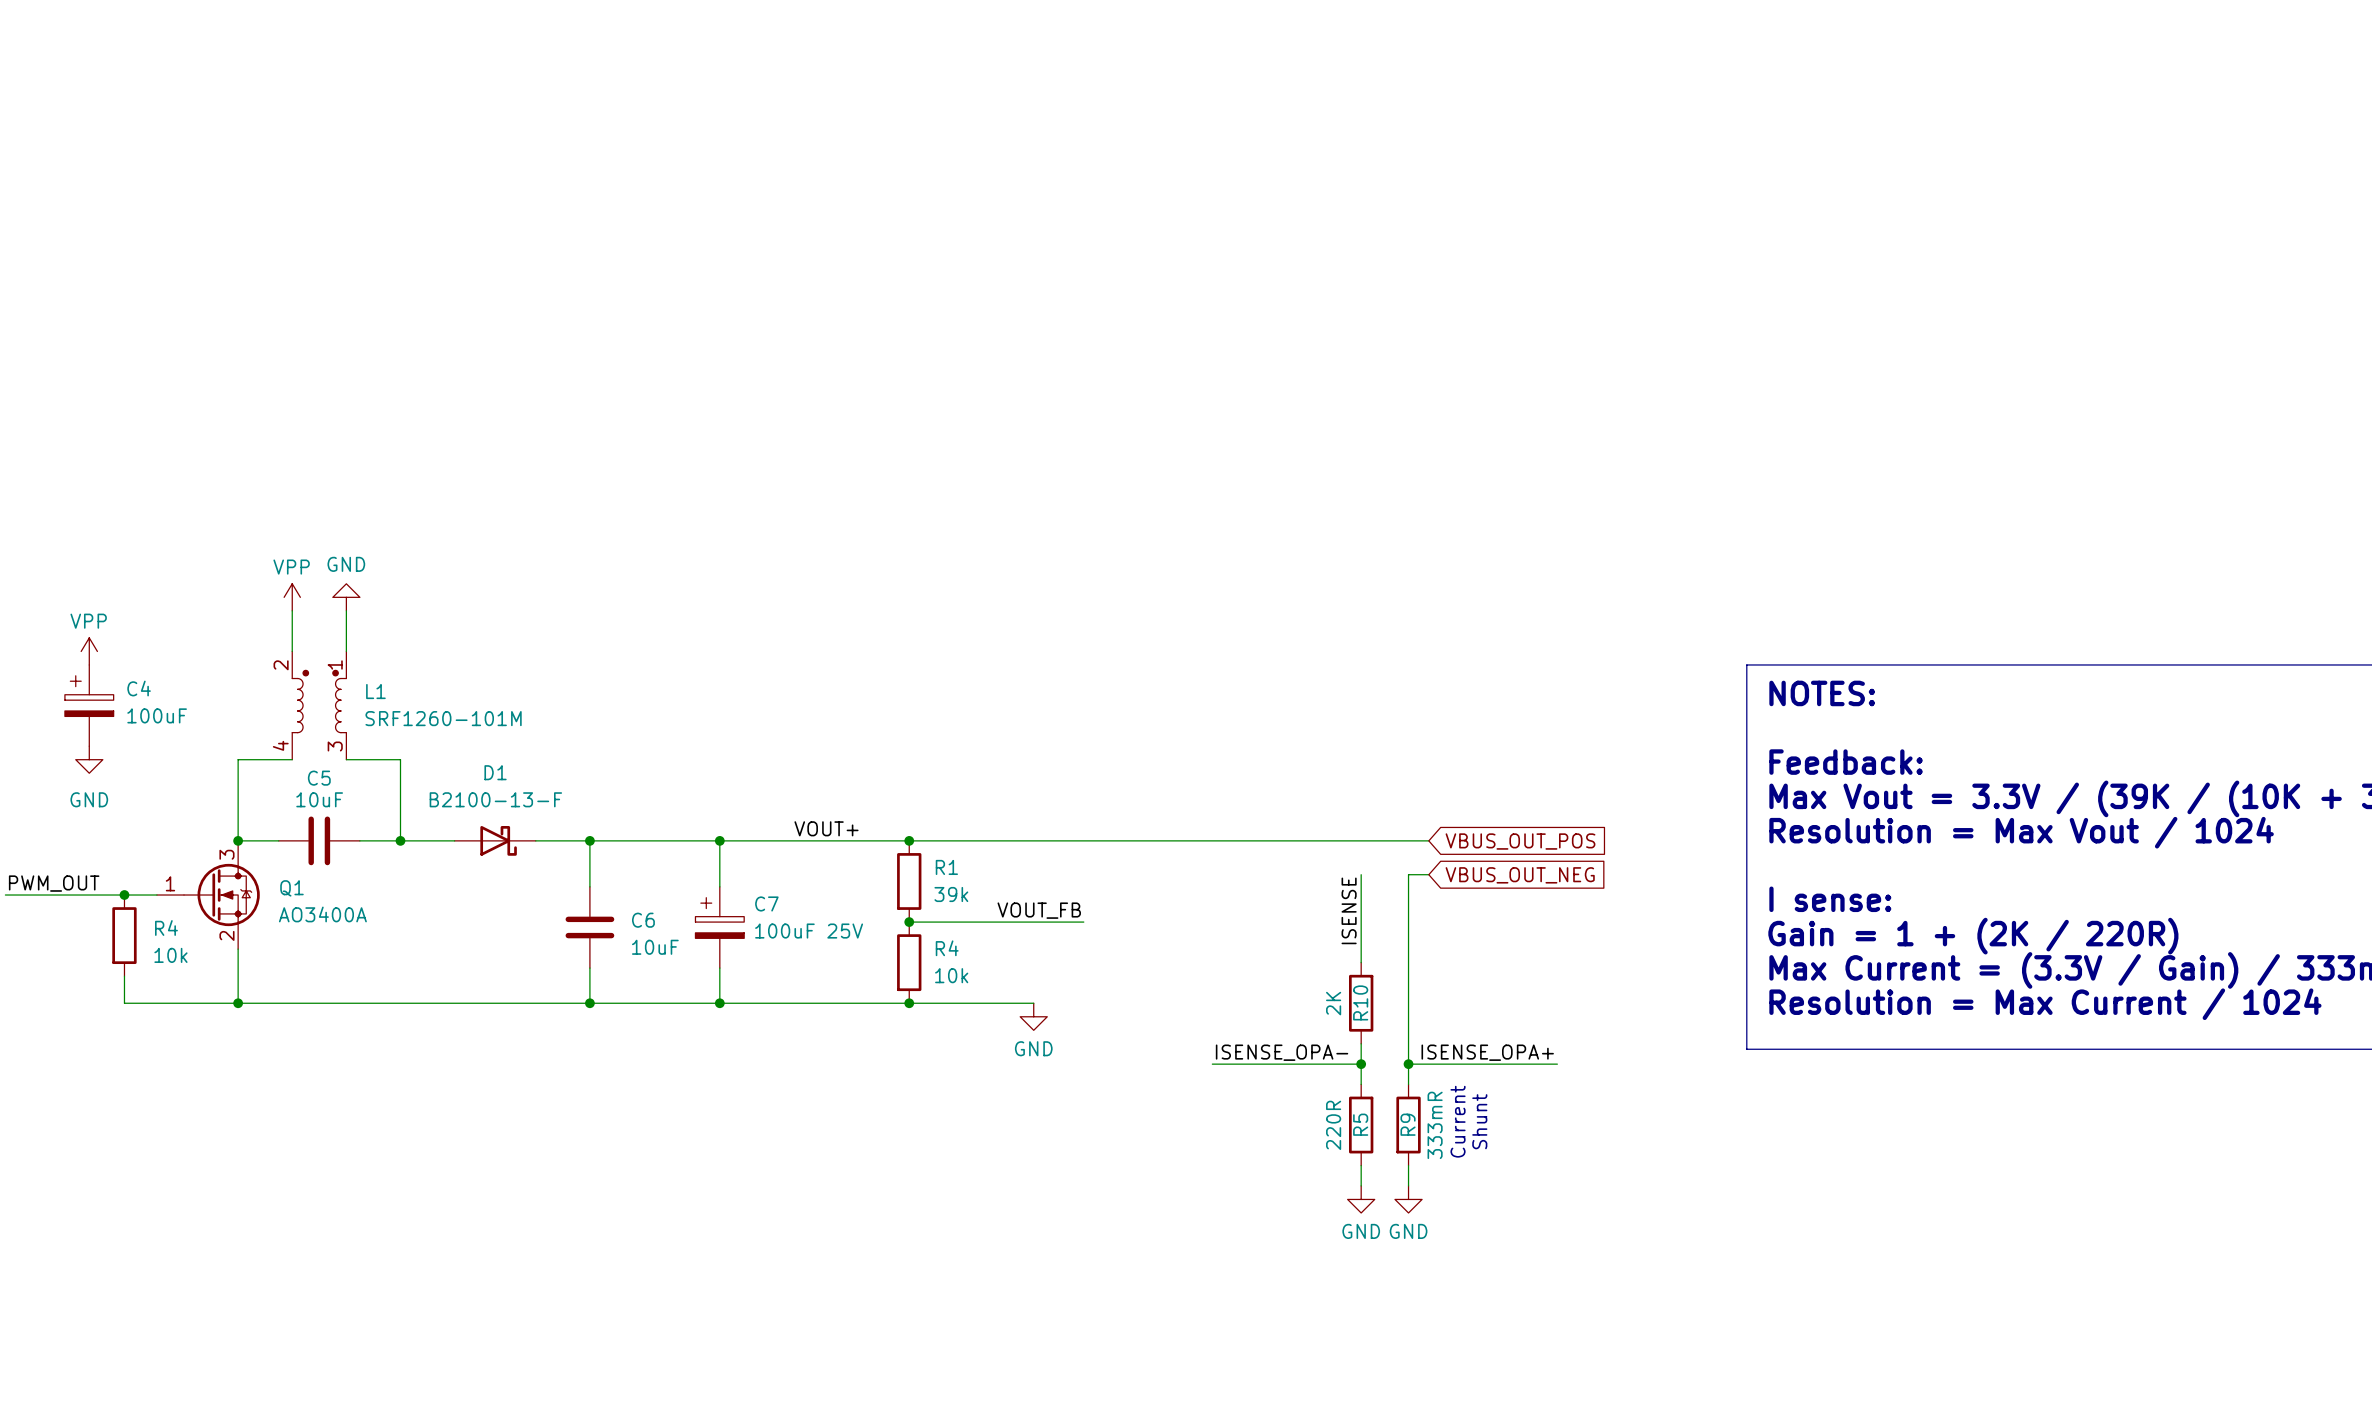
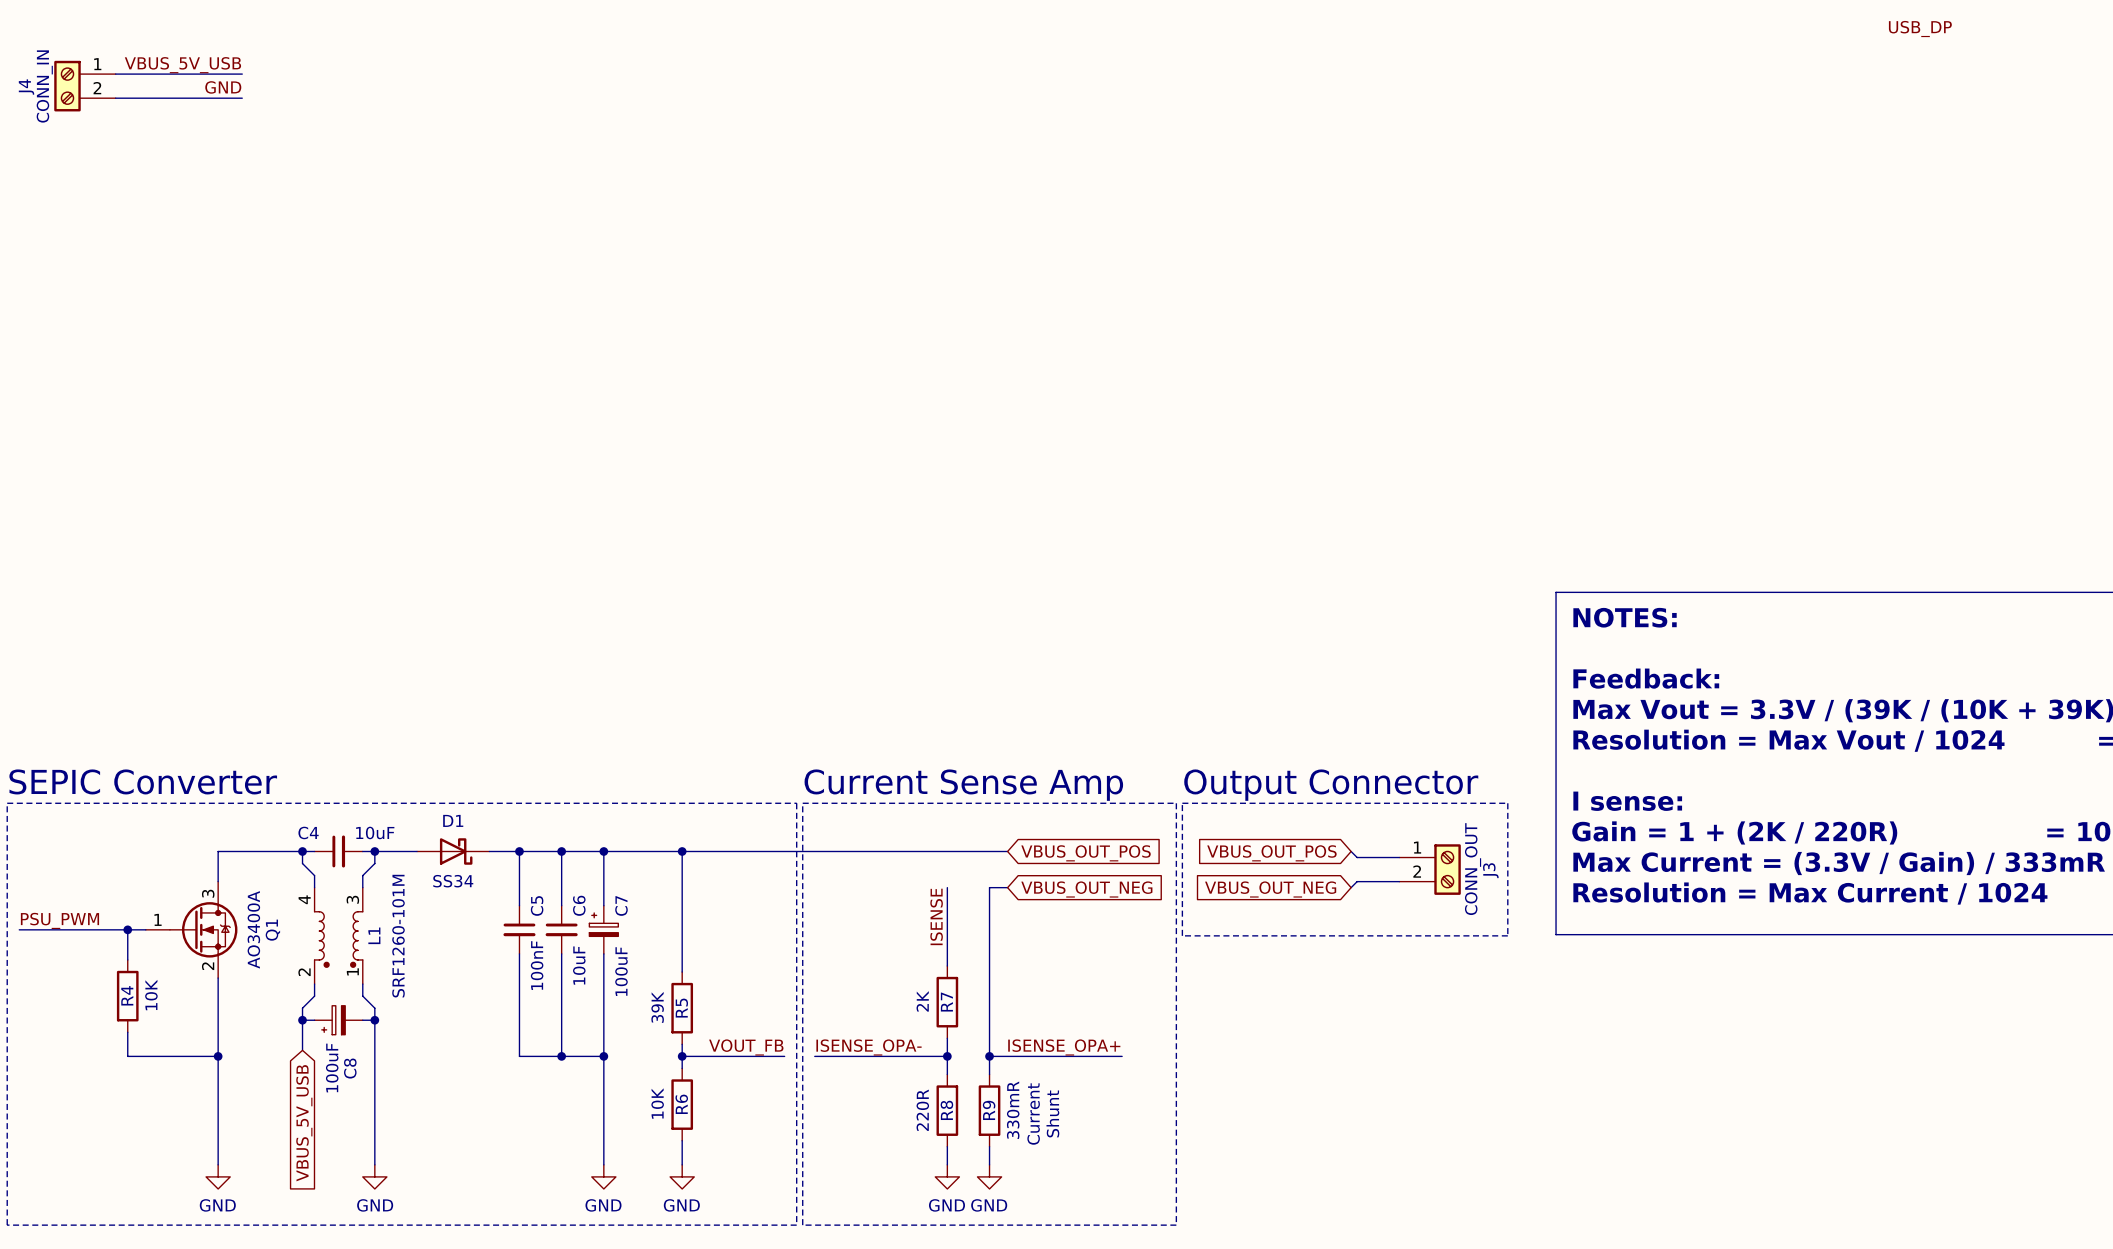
label: none -> USB_DP (1920, 29)
label: none -> VBUS_5V_USB (182, 65)
wire: none -> (115, 74) (242, 74)
J4: none -> CONN_IN (84, 86)
label: none -> GND (223, 87)
wire: none -> (115, 98) (242, 98)
power symbol: VPP (292, 597) -> none
power symbol: GND (346, 597) -> none
wire: (292, 610) (292, 651) -> none
wire: (346, 610) (346, 651) -> none
power symbol: VPP (89, 651) -> none
C4 symbol: [64, 664, 114, 747] -> [314, 835, 363, 868]
C4 name position: C4 (139, 688) -> C4 (308, 832)
L1 name position: L1 (375, 691) -> L1 (374, 935)
L1 flip: as is (319, 701) -> up-down (338, 939)
L1 position: (319, 705) -> (338, 935)
C4 value: 100uF (157, 715) -> 10uF (375, 832)
L1 value position: SRF1260-101M (443, 718) -> SRF1260-101M (398, 936)
power symbol: GND (89, 759) -> none
wire: (292, 759) (238, 759) (238, 840) (278, 840) -> none
wire: (346, 759) (400, 759) (400, 840) -> none
D1 name position: D1 (495, 772) -> D1 (453, 820)
C5 name position: C5 (319, 778) -> C5 (537, 905)
C5 value: 10uF (319, 799) -> 100nF (537, 965)
D1 value: B2100-13-F (495, 799) -> SS34 (453, 881)
C5 symbol: [278, 816, 360, 866] -> [503, 905, 536, 954]
label: VOUT+ (826, 828) -> none
junction: (238, 840) -> none
wire: (359, 840) (454, 840) -> none
junction: (400, 840) -> none
D1 position: (495, 840) -> (453, 851)
wire: (535, 840) (1428, 840) -> none
wire: (589, 840) (589, 886) -> none
junction: (589, 840) -> none
wire: (719, 840) (719, 886) -> none
junction: (719, 840) -> none
junction: (909, 840) -> none
global label rotation: 0° (1520, 841) -> 180° (1271, 853)
wire: (1361, 874) (1361, 962) -> none
wire: (1428, 874) (1408, 874) (1408, 1084) -> none
global label rotation: 0° (1520, 875) -> 180° (1270, 889)
text: none -> SEPIC Converter (143, 781)
R1: 39k (909, 881) -> none
text: none -> Current Sense Amp (963, 785)
text: none -> Output Connector (1331, 785)
label: PWM_OUT (54, 883) -> none
C6 symbol: [565, 886, 615, 969] -> [545, 905, 578, 954]
C7 symbol: [695, 886, 745, 969] -> [589, 905, 619, 954]
Q1 name rotation: 0° (291, 888) -> 90° counterclockwise (272, 930)
wire: (5, 895) (156, 895) -> none
junction: (124, 895) -> none
Q1 position: (208, 895) -> (191, 929)
line: none -> (7, 803) (796, 803) (796, 1225) (7, 1225) (7, 803)
line: none -> (802, 803) (1176, 803) (1176, 1225) (802, 1225) (802, 803)
line: none -> (1182, 803) (1507, 803) (1507, 935) (1182, 935) (1182, 803)
C7 name position: C7 (766, 903) -> C7 (621, 905)
label: VOUT_FB (1039, 910) -> none
label: ISENSE (1349, 910) -> none
Q1 value rotation: 0° (322, 914) -> 90° counterclockwise (253, 929)
C6 name position: C6 (643, 920) -> C6 (579, 905)
wire: (909, 922) (1083, 922) -> none
junction: (909, 922) -> none
C7 value: 100uF 25V (809, 931) -> 100uF (621, 971)
R4: 10k (124, 935) -> none
C6 value position: 10uF (655, 947) -> 10uF (579, 965)
wire: (238, 949) (238, 1003) -> none
wire: none -> (302, 851) (302, 863) (314, 875) (314, 887)
junction: none -> (302, 851)
wire: none -> (314, 851) (218, 851) (218, 881)
wire: none -> (362, 851) (417, 851)
wire: none -> (374, 851) (374, 863) (362, 875) (362, 887)
junction: none -> (374, 851)
wire: none -> (489, 851) (1007, 851)
wire: none -> (519, 851) (519, 905)
junction: none -> (519, 851)
wire: none -> (561, 851) (561, 905)
junction: none -> (561, 851)
wire: none -> (603, 851) (603, 905)
junction: none -> (603, 851)
wire: none -> (682, 851) (682, 972)
junction: none -> (682, 851)
wire: none -> (1351, 851) (1357, 857) (1399, 857)
global label: none -> VBUS_OUT_POS (1086, 853)
R4: 10k (909, 962) -> none
wire: (589, 968) (589, 1003) -> none
wire: (719, 968) (719, 1003) -> none
wire: (124, 976) (124, 1003) (1033, 1003) -> none
J3: none -> CONN_OUT (1430, 869)
wire: none -> (1399, 881) (1357, 881) (1351, 887)
wire: none -> (947, 887) (947, 966)
wire: none -> (1007, 887) (989, 887) (989, 1074)
global label: none -> VBUS_OUT_NEG (1086, 889)
junction: (238, 1003) -> none
junction: (589, 1003) -> none
junction: (719, 1003) -> none
junction: (909, 1003) -> none
R10: 2K (1361, 1003) -> none
power symbol: GND (1033, 1016) -> none
label: none -> PSU_PWM (59, 920)
label: none -> ISENSE (936, 916)
wire: none -> (19, 929) (145, 929)
wire: none -> (127, 929) (127, 959)
junction: none -> (127, 929)
wire: (1361, 1043) (1361, 1084) -> none
label: ISENSE_OPA- (1282, 1052) -> none
label: ISENSE_OPA+ (1487, 1052) -> none
wire: (1212, 1064) (1361, 1064) -> (989, 1056) (1122, 1056)
junction: (1361, 1064) -> none
wire: (1408, 1064) (1557, 1064) -> none
junction: (1408, 1064) -> none
wire: none -> (519, 953) (519, 1056) (603, 1056)
wire: none -> (561, 953) (561, 1056)
wire: none -> (603, 953) (603, 1164)
wire: none -> (218, 978) (218, 1164)
wire: none -> (314, 984) (314, 996) (302, 1008) (302, 1050)
wire: none -> (362, 984) (362, 996) (374, 1008) (374, 1164)
R4: none -> 10K (127, 996)
text: Current (1458, 1121) -> none
text: Shunt (1479, 1121) -> none
R7: none -> 2K (947, 1002)
R5 value: 220R (1333, 1125) -> 39K (657, 1007)
R5 position: (1361, 1125) -> (682, 1008)
R9 position: (1408, 1125) -> (989, 1110)
R9 value: 333mR (1435, 1125) -> 330mR (1013, 1110)
wire: none -> (302, 1020) (314, 1020)
junction: none -> (302, 1020)
C8: none -> 100uF (338, 1020)
wire: none -> (362, 1020) (374, 1020)
junction: none -> (374, 1020)
wire: none -> (127, 1032) (127, 1056) (218, 1056)
wire: none -> (947, 1038) (947, 1074)
wire: (1361, 1165) (1361, 1185) -> none
wire: (1408, 1165) (1408, 1185) -> none
wire: none -> (682, 1044) (682, 1068)
label: none -> VOUT_FB (746, 1047)
label: none -> ISENSE_OPA- (868, 1047)
label: none -> ISENSE_OPA+ (1064, 1047)
junction: none -> (218, 1056)
junction: none -> (561, 1056)
junction: none -> (603, 1056)
wire: none -> (682, 1056) (784, 1056)
junction: none -> (682, 1056)
wire: none -> (814, 1056) (947, 1056)
junction: none -> (947, 1056)
junction: none -> (989, 1056)
power symbol: GND (1361, 1199) -> none
power symbol: GND (1408, 1199) -> none
R6: none -> 10K (682, 1104)
R8: none -> 220R (947, 1110)
text: none -> Current (1033, 1114)
text: none -> Shunt (1052, 1113)
global label: none -> VBUS_5V_USB (304, 1123)
wire: none -> (682, 1140) (682, 1164)
wire: none -> (947, 1146) (947, 1164)
wire: none -> (989, 1146) (989, 1164)
power symbol: none -> GND (218, 1176)
power symbol: none -> GND (374, 1176)
power symbol: none -> GND (603, 1176)
power symbol: none -> GND (682, 1176)
power symbol: none -> GND (947, 1176)
power symbol: none -> GND (989, 1176)

